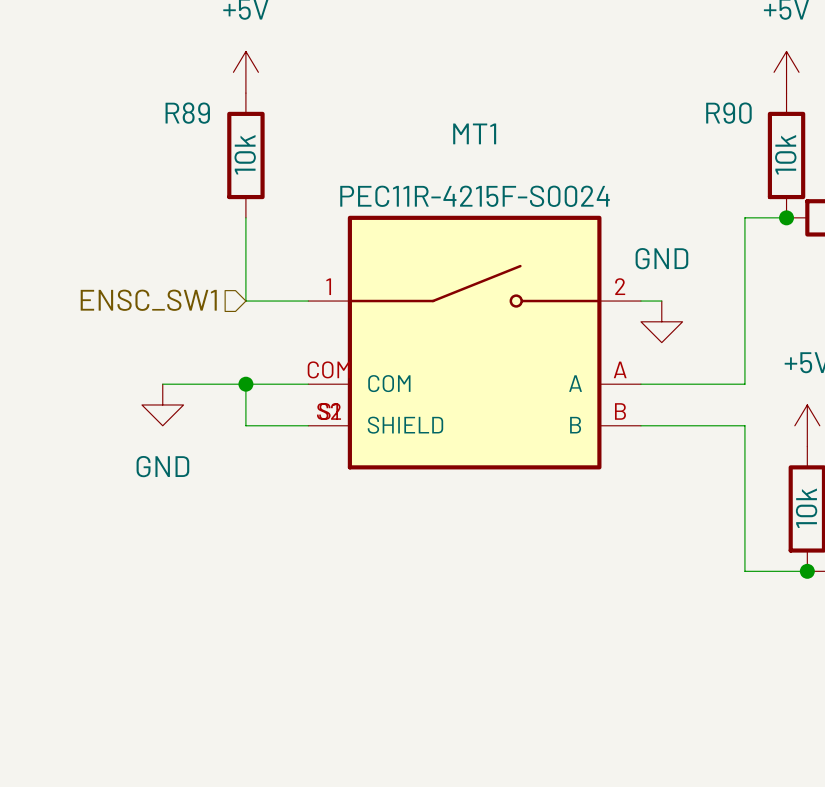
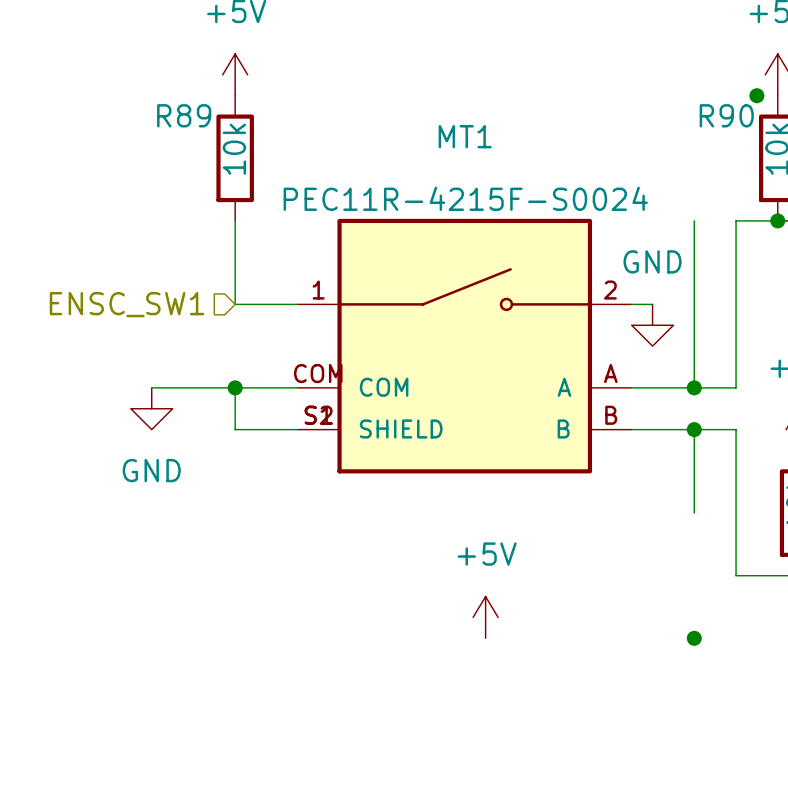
junction: none -> (756, 95)
wire: none -> (694, 220) (694, 387)
junction: none -> (694, 387)
wire: none -> (694, 429) (694, 513)
junction: none -> (694, 429)
power symbol: none -> +5V (485, 617)
junction: none -> (694, 638)

